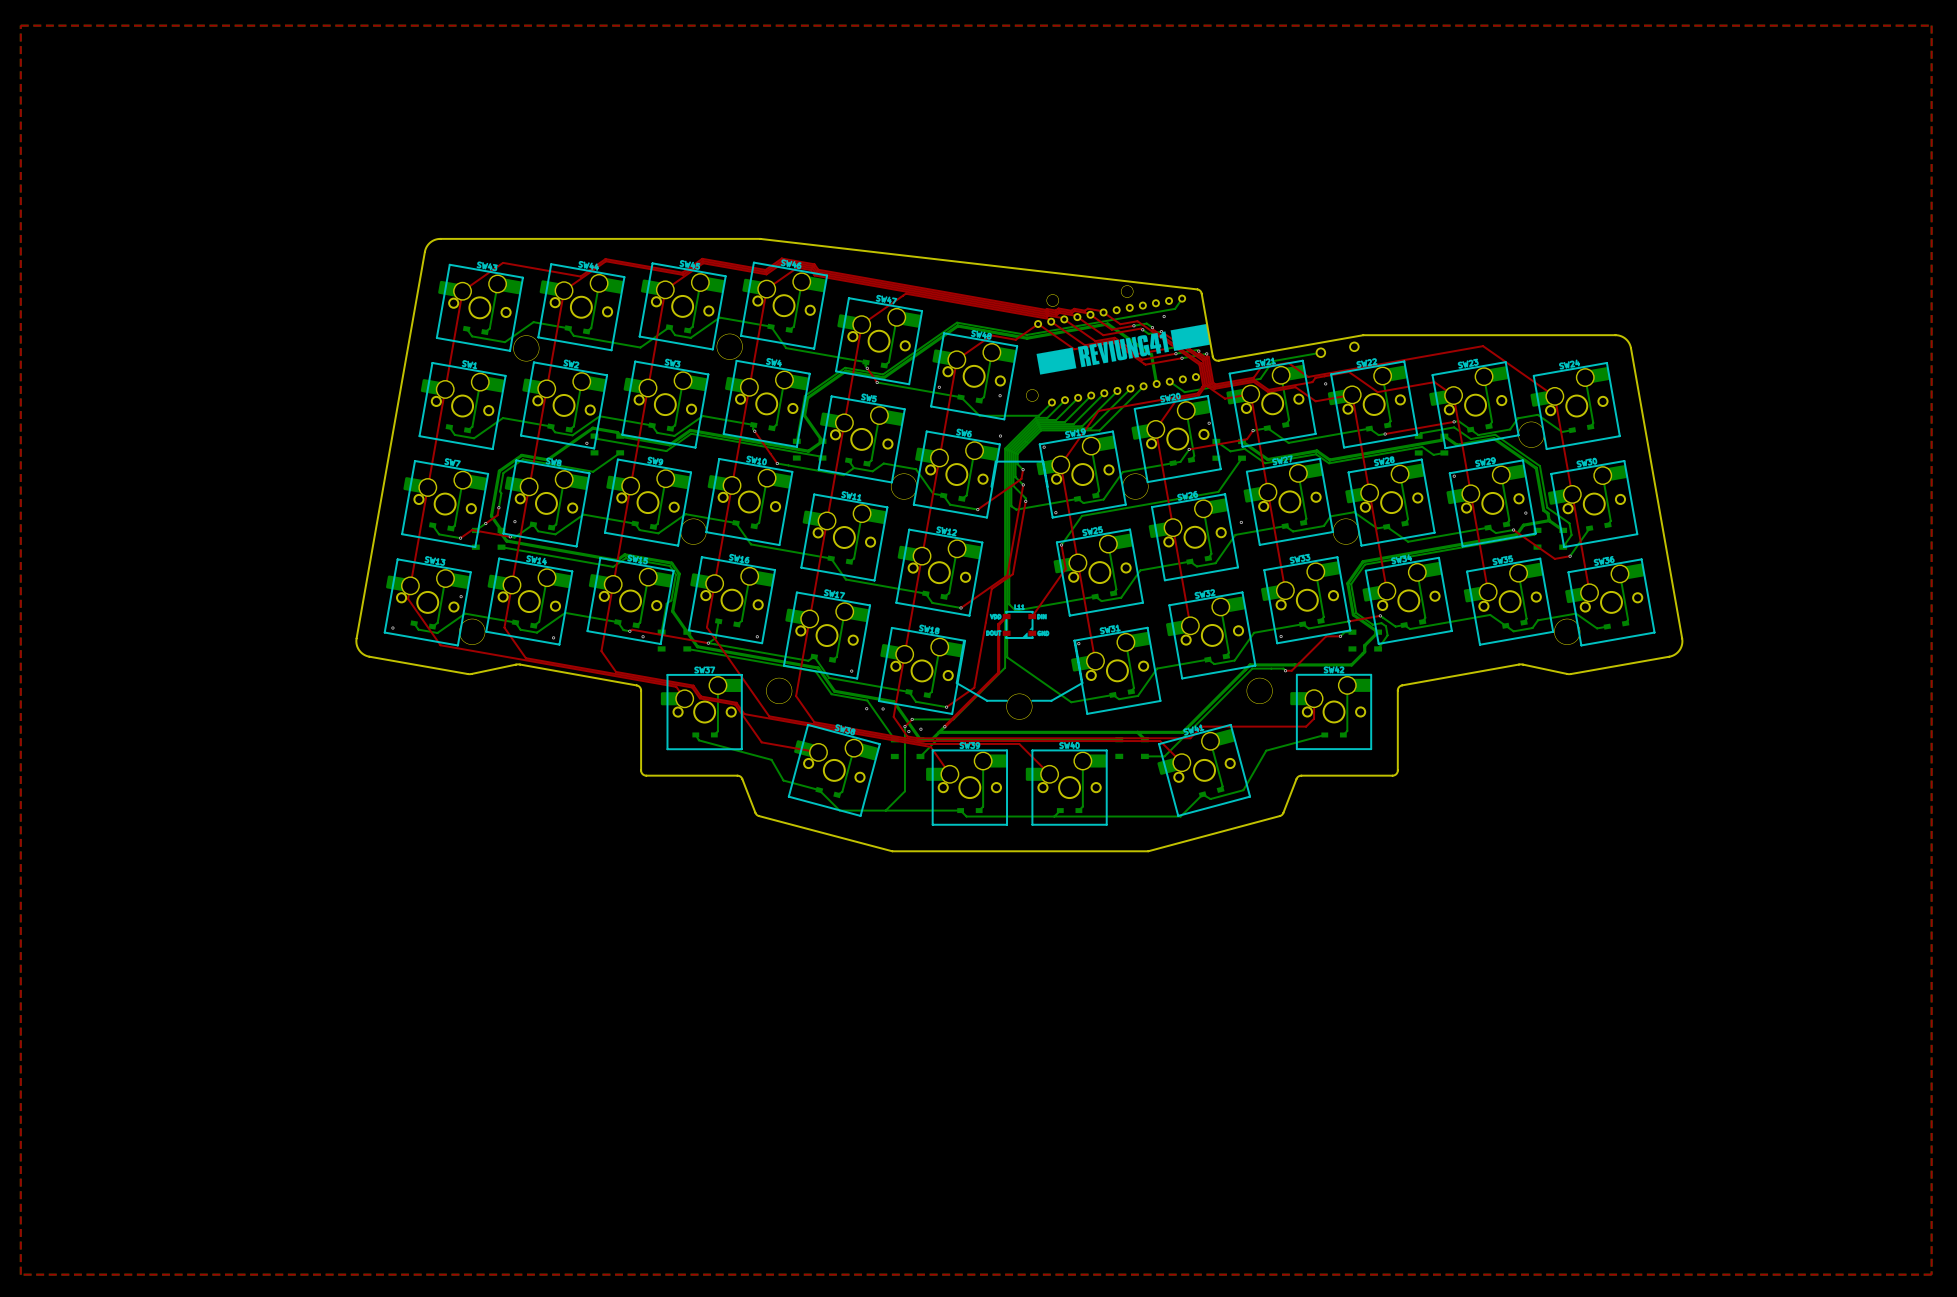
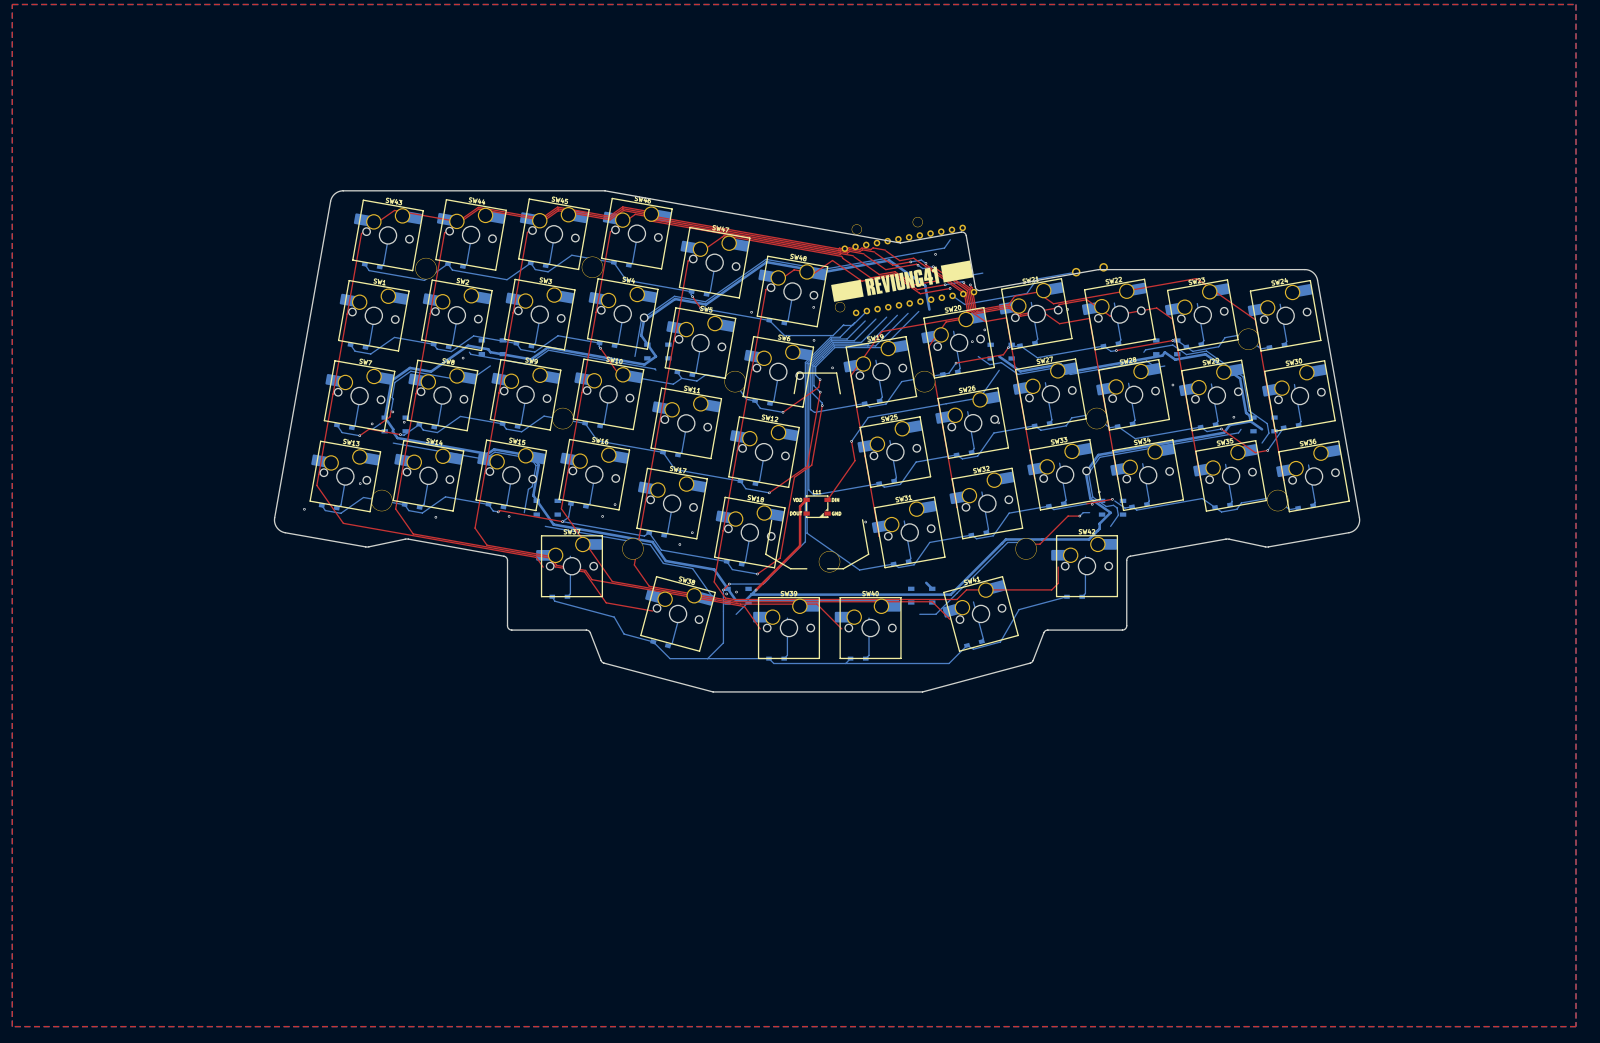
board edge: (440, 238) (760, 238) (1197, 289) (1201, 293) (1212, 356) (1217, 360) (1363, 335) (1620, 336) (1627, 340) (1630, 348) (1682, 638) (1681, 646) (1677, 652) (1671, 656) (1570, 674) (1520, 664) (1401, 685) (1397, 690) (1397, 770) (1395, 774) (1299, 775) (1296, 778) (1280, 815) (1148, 851) (892, 851) (758, 815) (755, 813) (742, 778) (739, 776) (642, 774) (641, 690) (637, 685) (518, 664) (468, 674) (367, 656) (358, 648) (356, 638) (424, 251) (430, 242) (440, 238) -> (343, 190) (334, 193) (330, 201) (274, 517) (276, 526) (283, 532) (366, 546) (407, 539) (504, 556) (507, 560) (508, 628) (587, 630) (603, 663) (713, 691) (922, 691) (1030, 662) (1046, 630) (1124, 629) (1126, 625) (1126, 560) (1129, 556) (1226, 539) (1268, 546) (1350, 532) (1358, 524) (1359, 517) (1317, 280) (1314, 274) (1309, 270) (1098, 269) (978, 290) (975, 287) (966, 235) (962, 232) (900, 242) (604, 190) (343, 190)
bottom track: (801, 281) (793, 326) (789, 329) -> (639, 225) (632, 262) (628, 265)
bottom track: (700, 282) (692, 327) (687, 330) -> (556, 226) (549, 262) (545, 265)
bottom track: (497, 283) (489, 328) (485, 331) -> (390, 227) (383, 264) (379, 267)
bottom track: (599, 283) (591, 328) (586, 331) -> (473, 227) (466, 263) (463, 266)
bottom track: (1182, 298) (1175, 308) (1026, 334) (957, 322) (883, 374) (845, 367) (804, 396) (796, 441) -> (950, 239) (944, 248) (823, 269) (766, 259) (705, 301) (674, 296) (641, 319) (634, 356)
top track: (1102, 311) (1087, 308) (1084, 310) (1074, 308) (1071, 310) (1058, 308) (1055, 310) (1045, 309) (818, 269) (814, 264) (781, 258) (765, 269) (702, 258) (682, 272) (605, 259) (580, 276) (503, 262) (462, 291) (410, 585) -> (885, 250) (873, 247) (870, 249) (838, 248) (652, 216) (649, 211) (622, 206) (609, 216) (557, 207) (541, 218) (478, 207) (457, 221) (394, 210) (361, 233) (318, 474)
top track: (1103, 312) (1120, 324) (1137, 321) (1199, 364) (1203, 385) (1197, 393) (1098, 410) (1060, 464) (1095, 661) -> (886, 251) (899, 260) (913, 258) (964, 293) (967, 310) (962, 317) (881, 331) (850, 375) (879, 536)
top track: (1089, 313) (1074, 311) (1071, 312) (1059, 310) (1056, 312) (1046, 312) (817, 271) (813, 266) (782, 260) (766, 272) (702, 261) (683, 274) (605, 261) (564, 290) (504, 627) (525, 658) (692, 687) (699, 698) (735, 704) (761, 742) (818, 752) -> (874, 251) (862, 249) (860, 251) (839, 250) (651, 217) (648, 213) (623, 208) (609, 218) (557, 208) (541, 220) (478, 209) (444, 233) (395, 508) (413, 533) (549, 557) (555, 566) (584, 571) (606, 602) (652, 611)
top track: (1090, 314) (1111, 329) (1133, 325) -> (875, 252) (892, 265) (910, 261)
top track: (1076, 315) (1059, 312) (1056, 314) (1046, 314) (815, 273) (812, 268) (782, 263) (766, 274) (703, 263) (665, 289) (630, 485) -> (863, 253) (849, 251) (839, 252) (650, 219) (647, 214) (623, 210) (610, 219) (558, 210) (527, 232) (499, 393)
via: (1164, 316) -> none
bottom track: (896, 317) (888, 362) (884, 365) -> (716, 254) (710, 291) (706, 294)
top track: (1077, 317) (1103, 335) (1142, 329) -> (864, 254) (885, 269) (918, 265)
top track: (1063, 318) (814, 275) (810, 270) (797, 267) (766, 289) (732, 485) -> none
top track: (1064, 319) (1095, 341) (1114, 337) (1137, 353) (1166, 348) -> (853, 256) (879, 274) (895, 271) (913, 284) (937, 280)
bottom track: (1133, 325) (1146, 323) (1152, 327) -> (910, 261) (921, 260) (925, 263)
via: (1133, 325) -> none
top track: (1152, 327) (1201, 363) (1205, 386) (1198, 395) (1176, 399) (1155, 429) (1190, 625) -> (925, 263) (965, 292) (969, 311) (963, 318) (946, 322) (928, 346) (956, 507)
via: (1152, 327) -> none
bottom track: (568, 328) (573, 335) (640, 347) (669, 327) (675, 335) (690, 337) (719, 317) (771, 326) (786, 348) (866, 362) (867, 368) -> none
bottom track: (568, 328) (533, 322) (504, 342) (472, 336) (466, 328) -> none
part position: (678, 328) -> (538, 264)
part position: (780, 328) -> (621, 263)
part position: (577, 329) -> (455, 265)
bottom track: (1142, 329) (1148, 333) (1161, 331) -> (918, 265) (922, 268) (933, 266)
via: (1142, 329) -> none
part position: (475, 330) -> (372, 265)
via: none -> (935, 254)
top track: (1161, 331) (1202, 360) (1207, 386) (1224, 398) (1250, 394) (1285, 590) -> (933, 266) (967, 290) (971, 311) (985, 321) (1006, 317) (1034, 478)
via: (1161, 331) -> none
top track: none -> (853, 255) (649, 220) (646, 216) (635, 214) (610, 231) (561, 508) (612, 581) (740, 604) (816, 604) (841, 628)
via: none -> (910, 261)
via: none -> (925, 263)
bottom track: none -> (364, 264) (369, 270) (424, 280) (448, 263) (452, 270) (507, 279) (530, 263) (535, 269) (548, 271) (571, 255) (613, 262) (626, 280) (691, 291) (692, 296)
via: none -> (918, 265)
via: none -> (933, 266)
top track: (1188, 346) (1189, 348) (1204, 359) (1209, 385) (1214, 388) (1253, 381) (1268, 392) (1295, 387) (1315, 401) (1352, 394) (1386, 591) -> (955, 278) (968, 289) (972, 310) (976, 313) (1008, 307) (1020, 316) (1043, 312) (1059, 323) (1089, 318) (1117, 479)
top track: none -> (794, 269) (765, 289) (714, 581) (725, 597) (956, 599) (966, 589) (1051, 589) (1058, 583) (1058, 567)
top track: none -> (794, 269) (814, 273) (832, 260) (861, 281) (894, 275) (920, 293) (950, 288)
drawing position: (1123, 349) -> (902, 281)
bottom track: (1198, 351) (1175, 353) -> (963, 282) (945, 284)
top track: (1198, 351) (1206, 358) (1211, 384) (1215, 386) (1254, 379) (1268, 389) (1312, 382) (1315, 377) (1348, 372) (1377, 392) (1434, 382) (1453, 395) (1488, 592) -> (963, 282) (970, 288) (974, 309) (977, 311) (1009, 306) (1021, 314) (1056, 308) (1059, 304) (1086, 299) (1110, 316) (1156, 308) (1172, 319) (1200, 479)
via: (1198, 351) -> none
bottom track: (991, 352) (984, 397) (979, 400) -> (794, 283) (788, 320) (784, 323)
top track: (1175, 353) (1142, 359) (1114, 340) (1084, 345) (1049, 319) (905, 293) (861, 324) (809, 618) -> (945, 284) (917, 289) (894, 273) (870, 277) (841, 256) (724, 235) (688, 260) (645, 501)
via: (1175, 353) -> none
top track: (1206, 353) (1213, 382) (1215, 384) (1253, 377) (1260, 367) (1288, 362) (1308, 376) (1483, 346) (1554, 396) (1589, 592) -> (970, 284) (977, 309) (1009, 304) (1014, 296) (1037, 292) (1053, 303) (1196, 278) (1255, 319) (1283, 480)
via: (1206, 353) -> none
top track: (1181, 358) (1145, 364) (1113, 342) (1074, 349) (1038, 324) (1015, 339) (991, 335) (956, 359) (893, 716) (907, 736) (917, 738) (1190, 738) (1202, 726) (1306, 726) (1314, 718) (1314, 698) -> none
via: (1181, 358) -> none
part position: (875, 363) -> (699, 293)
via: none -> (963, 282)
top track: (867, 368) (877, 382) -> (692, 296) (700, 308)
via: (867, 368) -> none
via: none -> (945, 284)
via: none -> (970, 284)
via: none -> (950, 288)
bottom track: (1281, 375) (1289, 420) (1285, 424) -> (1031, 302) (1037, 339) (1035, 343)
bottom track: (1382, 376) (1390, 421) (1387, 425) -> (1114, 303) (1120, 340) (1118, 343)
bottom track: (1484, 376) (1492, 422) (1489, 426) -> (1197, 303) (1203, 340) (1201, 344)
bottom track: (1585, 377) (1593, 423) (1590, 426) -> (1280, 304) (1286, 341) (1284, 344)
bottom track: (784, 379) (776, 425) (772, 428) -> (624, 306) (618, 343) (614, 345)
bottom track: (683, 380) (675, 425) (670, 428) -> (541, 306) (535, 343) (531, 346)
bottom track: (581, 381) (573, 426) (569, 429) -> (458, 307) (452, 344) (448, 346)
bottom track: (480, 382) (472, 426) (467, 430) -> (375, 308) (369, 344) (365, 347)
via: none -> (692, 296)
bottom track: (877, 382) (961, 397) (979, 415) (1038, 415) (1052, 402) -> none
via: (877, 382) -> none
via position: (1325, 383) -> (1067, 309)
bottom track: (1156, 384) (1151, 354) (1107, 324) (1027, 338) (957, 325) (883, 377) (845, 371) (807, 397) (804, 415) (822, 441) (808, 451) (690, 430) (669, 444) (620, 436) (617, 432) (592, 428) (547, 459) (521, 455) (499, 471) (491, 516) (506, 541) (616, 560) (624, 554) (671, 563) (679, 573) (672, 611) (697, 646) (818, 668) (834, 691) (893, 701) (920, 739) (931, 739) (939, 732) (1182, 732) (1250, 664) (1351, 664) (1364, 651) (1364, 645) (1378, 632) (1353, 614) (1347, 583) (1363, 561) (1516, 534) (1523, 525) (1549, 520) -> none
bottom track: (1143, 386) (1099, 430) (1041, 430) (1017, 453) (1017, 464) (1023, 469) -> (918, 311) (882, 347) (834, 347) (815, 366) (815, 375) (820, 379)
via position: (939, 387) -> (751, 312)
bottom track: (1130, 388) (1090, 428) (1040, 428) (1015, 453) (1015, 477) (1023, 484) -> (908, 313) (875, 345) (834, 345) (813, 366) (813, 385) (820, 392)
bottom track: (1117, 390) (1082, 426) (1039, 426) (1013, 452) (1013, 486) (1025, 498) (1025, 501) -> (897, 315) (868, 344) (833, 344) (812, 365) (812, 393) (822, 403) (822, 405)
bottom track: (1104, 393) (1073, 424) (1038, 424) (1011, 451) (1011, 506) (1016, 509) (1077, 498) (1083, 503) (1103, 499) (1122, 472) (1180, 461) (1189, 449) -> (886, 317) (861, 342) (832, 342) (810, 364) (810, 409) (814, 412) (864, 403) (869, 406) (886, 404) (901, 381) (948, 373) (956, 363)
bottom track: (1091, 395) (1064, 422) (1037, 422) (1009, 450) (1009, 604) (1015, 610) (1095, 596) (1101, 601) (1121, 597) (1140, 570) (1189, 561) (1196, 566) (1215, 563) (1235, 534) (1285, 526) (1293, 531) (1324, 526) (1330, 516) (1354, 512) (1377, 528) (1386, 526) (1408, 541) (1488, 527) (1495, 533) (1513, 529) -> (875, 319) (854, 340) (832, 340) (808, 363) (808, 489) (813, 495) (879, 483) (884, 487) (900, 484) (916, 462) (956, 454) (962, 458) (977, 456) (993, 433) (1034, 425) (1041, 430) (1066, 425) (1071, 417) (1090, 414) (1109, 427) (1117, 426) (1135, 438) (1200, 427) (1207, 431) (1221, 429)
via: none -> (700, 308)
bottom track: (1078, 397) (1056, 419) (1036, 419) (1007, 449) (1007, 657) (1071, 702) (1112, 694) (1119, 699) (1138, 695) (1157, 668) (1207, 659) (1214, 664) (1234, 660) (1254, 632) (1302, 624) (1308, 628) (1349, 621) -> (865, 320) (847, 338) (831, 338) (807, 363) (807, 533) (859, 570) (893, 564) (898, 567) (914, 564) (929, 542) (971, 535) (976, 538) (993, 535) (1009, 513) (1048, 506) (1053, 509) (1086, 503)
bottom track: none -> (929, 309) (925, 285) (889, 260) (823, 272) (766, 262) (706, 304) (675, 299) (643, 320) (641, 335) (655, 356) (644, 364) (547, 347) (531, 359) (490, 352) (488, 349) (468, 345) (430, 371) (409, 367) (391, 380) (385, 417) (397, 438) (487, 453) (494, 449) (532, 456) (538, 464) (533, 495) (553, 524) (652, 541) (665, 561) (714, 569) (736, 600) (745, 600) (756, 590)
part position: (970, 399) -> (776, 321)
bottom track: (1186, 410) (1194, 455) (1191, 459) -> (953, 331) (960, 368) (957, 371)
bottom track: none -> (854, 322) (840, 337) (830, 337) (805, 362) (805, 541) (763, 584) (729, 584)
bottom track: (879, 415) (871, 460) (867, 463) -> (702, 335) (696, 372) (692, 374)
bottom track: (1454, 421) (1458, 421) (1478, 435) (1510, 429) (1517, 418) (1537, 414) (1562, 431) (1572, 430) -> (1172, 340) (1176, 339) (1192, 351) (1218, 346) (1225, 337) (1241, 334) (1261, 348) (1269, 347)
top track: (1454, 421) (1385, 434) -> (1172, 340) (1116, 350)
via position: (1454, 421) -> (1172, 340)
part position: (762, 426) -> (607, 344)
part position: (1276, 426) -> (1027, 344)
bottom track: (449, 427) (454, 434) (474, 438) (503, 418) (550, 426) (555, 432) (572, 435) (599, 416) (652, 425) (657, 432) (674, 435) (702, 416) (753, 424) (754, 431) -> (350, 344) (355, 351) (370, 354) (394, 337) (433, 344) (437, 349) (451, 351) (473, 335) (516, 343) (520, 349) (534, 352) (558, 335) (599, 343) (600, 348)
part position: (661, 427) -> (524, 344)
part position: (1378, 427) -> (1111, 344)
part position: (458, 428) -> (358, 346)
part position: (560, 428) -> (441, 345)
part position: (1479, 428) -> (1193, 345)
part position: (1581, 428) -> (1277, 346)
bottom track: (1023, 430) (1005, 448) (1005, 667) (953, 719) (912, 719) -> (832, 335) (784, 335) (769, 320) (700, 308)
bottom track: (1253, 430) (1267, 428) (1288, 442) (1369, 428) (1378, 435) (1385, 434) -> (1008, 347) (1020, 345) (1037, 357) (1103, 346) (1111, 351) (1116, 350)
top track: (1253, 430) (1247, 439) (1189, 449) -> (1008, 347) (1003, 354) (956, 363)
via position: (1253, 430) -> (1008, 347)
top track: (754, 431) (777, 463) -> (600, 348) (618, 374)
via: (754, 431) -> none
via position: (1385, 434) -> (1116, 350)
bottom track: (594, 436) (596, 438) (666, 451) (691, 433) (822, 458) -> (469, 352) (470, 354) (528, 364) (548, 350) (655, 370)
bottom track: (1418, 436) (1420, 433) (1454, 427) (1470, 439) (1495, 434) (1539, 466) (1547, 507) (1569, 523) (1571, 535) (1563, 547) -> (1143, 352) (1145, 349) (1172, 345) (1186, 354) (1206, 351) (1243, 376) (1249, 410) (1267, 423) (1268, 433) (1262, 443)
via: none -> (972, 341)
bottom track: (1216, 441) (1230, 451) (1244, 448) (1265, 463) (1316, 454) (1329, 463) (1422, 446) (1433, 454) (1444, 452) -> (978, 356) (989, 364) (1001, 362) (1018, 374) (1059, 367) (1070, 374) (1146, 361) (1156, 367) (1164, 366)
bottom track: (1242, 441) (1267, 459) (1316, 450) (1329, 460) (1441, 440) (1444, 436) (1457, 445) (1494, 438) (1536, 468) (1543, 510) (1547, 513) (1549, 520) -> (999, 356) (1020, 371) (1060, 364) (1071, 371) (1162, 355) (1164, 352) (1175, 359) (1205, 354) (1240, 378) (1246, 413) (1249, 415) (1250, 421)
via position: (586, 443) -> (463, 358)
via: none -> (600, 348)
bottom track: (1091, 446) (1099, 490) (1095, 495) -> (875, 360) (882, 397) (879, 400)
via: (1044, 447) -> none
via: (1189, 449) -> none
bottom track: (974, 450) (966, 495) (961, 498) -> (780, 364) (773, 400) (770, 403)
bottom track: (620, 452) (593, 471) (522, 459) (503, 473) (498, 507) -> (490, 365) (468, 381) (410, 371) (394, 382) (391, 410)
bottom track: (1242, 458) (1218, 491) (1081, 515) (1061, 545) -> (999, 370) (979, 397) (868, 417) (851, 441)
bottom track: (848, 460) (853, 468) -> (677, 372) (681, 378)
part position: (1182, 461) -> (950, 373)
part position: (857, 462) -> (684, 373)
bottom track: (777, 463) (843, 475) (853, 468) -> (618, 374) (673, 384) (681, 378)
via: (777, 463) -> none
via: none -> (956, 363)
bottom track: (853, 468) (872, 471) (883, 463) (915, 469) (933, 493) (943, 495) (950, 504) (977, 509) -> (681, 378) (696, 381) (706, 374) (732, 379) (746, 399) (755, 400) (760, 408) (783, 412)
top track: (1023, 469) (1021, 479) (977, 509) -> (820, 379) (818, 387) (783, 412)
bottom track: (1298, 473) (1306, 518) (1303, 522) -> (1045, 382) (1051, 419) (1049, 423)
bottom track: (1400, 474) (1408, 519) (1405, 523) -> (1128, 383) (1135, 420) (1132, 423)
bottom track: (1501, 474) (1509, 520) (1506, 524) -> (1211, 383) (1217, 421) (1215, 424)
bottom track: (1602, 475) (1610, 521) (1607, 525) -> (1294, 384) (1301, 421) (1298, 425)
via position: (1454, 476) -> (1172, 385)
bottom track: (665, 478) (657, 523) (653, 526) -> (527, 387) (521, 424) (517, 426)
bottom track: (767, 478) (759, 522) (754, 526) -> (610, 386) (604, 423) (600, 426)
bottom track: (564, 479) (556, 524) (551, 527) -> (444, 387) (438, 424) (434, 427)
bottom track: (462, 480) (454, 525) (450, 528) -> (361, 388) (355, 425) (351, 427)
via: none -> (820, 379)
top track: (1023, 484) (1007, 575) (961, 607) -> (820, 392) (807, 466) (769, 492)
via: (1023, 484) -> none
top track: (732, 485) (714, 583) -> none
top track: (630, 486) (601, 651) (616, 671) (693, 685) (701, 696) (736, 702) (744, 714) (930, 746) (949, 774) -> (498, 393) (475, 528) (487, 545) (550, 556) (556, 565) (585, 570) (592, 579) (744, 606) (760, 628)
line: (991, 486) (995, 461) (1043, 461) (1047, 486) -> (794, 393) (797, 373) (836, 373) (840, 393)
part position: (952, 497) -> (762, 402)
part position: (1086, 497) -> (872, 402)
via: none -> (820, 392)
top track: (1025, 501) (1012, 574) (991, 589) (974, 687) (946, 707) -> (822, 405) (811, 465) (794, 477) (780, 558) (757, 574)
via: (1025, 501) -> none
top track: (498, 507) (497, 515) (485, 523) -> (391, 410) (390, 416) (380, 423)
via: (498, 507) -> none
bottom track: (1203, 508) (1211, 553) (1208, 558) -> (967, 411) (974, 448) (971, 452)
via: (977, 509) -> none
via: (1055, 512) -> none
bottom track: (862, 513) (854, 558) (849, 561) -> (688, 415) (681, 452) (678, 455)
via: (1525, 513) -> none
via: none -> (822, 405)
bottom track: (1549, 520) (1563, 530) -> (1250, 421) (1262, 429)
via: (514, 521) -> none
via position: (1241, 522) -> (998, 422)
bottom track: (485, 523) (475, 530) -> (380, 423) (372, 429)
via: none -> (783, 412)
part position: (745, 524) -> (592, 424)
part position: (1294, 524) -> (1042, 424)
bottom track: (432, 525) (439, 534) (460, 538) -> (336, 425) (342, 432) (359, 435)
part position: (644, 525) -> (510, 425)
part position: (1395, 525) -> (1125, 425)
part position: (441, 526) -> (344, 426)
part position: (542, 526) -> (426, 425)
part position: (1497, 526) -> (1208, 425)
part position: (1598, 526) -> (1291, 426)
bottom track: (1589, 528) (1570, 556) -> (1283, 427) (1267, 450)
top track: (1513, 529) (1554, 558) (1570, 556) -> (1221, 429) (1255, 452) (1267, 450)
bottom track: (1537, 530) (1534, 534) (1364, 564) (1351, 584) (1356, 613) (1372, 624) (1381, 623) (1385, 626) (1387, 635) (1378, 648) -> (1241, 429) (1238, 432) (1099, 457) (1088, 473) (1092, 497) (1106, 506) (1113, 505) (1117, 507) (1118, 515) (1110, 526)
bottom track: none -> (1250, 421) (1229, 425) (1224, 432) (1098, 454) (1085, 472) (1090, 498) (1110, 512) (1099, 523) (1099, 528) (1088, 539) (1005, 539) (950, 594) (751, 594)
via: none -> (404, 422)
bottom track: (510, 536) (514, 537) (533, 524) (538, 531) (555, 534) (583, 514) (635, 523) (639, 530) (658, 533) (685, 514) (736, 523) (750, 544) (831, 558) (845, 579) (925, 593) (932, 602) (961, 607) -> (400, 434) (404, 435) (419, 424) (423, 430) (437, 432) (460, 416) (502, 423) (506, 429) (521, 431) (544, 416) (585, 423) (597, 440) (663, 452) (675, 469) (740, 481) (745, 488) (769, 492)
top track: (510, 536) (472, 530) (460, 538) -> (400, 434) (369, 429) (359, 435)
via: (510, 536) -> none
bottom track: (1108, 544) (1116, 589) (1113, 593) -> (889, 440) (896, 477) (894, 480)
via: none -> (1221, 429)
top track: (1061, 545) (1065, 568) (1032, 616) -> (851, 441) (854, 460) (827, 499)
via position: (1061, 545) -> (851, 441)
bottom track: (501, 547) (612, 567) (625, 558) (669, 565) (675, 574) (671, 600) (666, 603) (661, 632) -> (393, 443) (484, 459) (494, 452) (531, 458) (536, 465) (532, 486) (528, 489) (524, 512)
bottom track: (957, 548) (949, 593) (944, 596) -> (766, 444) (759, 480) (755, 483)
via: none -> (400, 434)
via: none -> (359, 435)
via position: (1570, 556) -> (1267, 450)
part position: (840, 560) -> (670, 453)
part position: (1199, 560) -> (964, 453)
bottom track: (1315, 571) (1323, 617) (1320, 621) -> (1059, 463) (1066, 500) (1063, 503)
bottom track: (1417, 572) (1425, 617) (1422, 621) -> (1142, 463) (1149, 500) (1147, 504)
bottom track: (1518, 573) (1526, 618) (1524, 622) -> (1225, 464) (1232, 501) (1230, 504)
bottom track: (1619, 573) (1628, 619) (1625, 623) -> (1308, 464) (1315, 502) (1313, 505)
bottom track: (749, 576) (741, 621) (736, 624) -> (596, 466) (589, 503) (585, 506)
bottom track: (547, 577) (539, 621) (533, 625) -> (430, 468) (424, 504) (419, 507)
bottom track: (648, 577) (640, 622) (636, 625) -> (513, 467) (506, 504) (503, 507)
bottom track: (445, 578) (437, 623) (432, 626) -> (347, 468) (340, 505) (336, 508)
top track: (714, 583) (706, 627) (769, 716) (925, 743) (1019, 743) (1049, 774) -> none
top track: (410, 585) (408, 598) (440, 645) (676, 686) (684, 698) -> (318, 474) (316, 485) (343, 523) (536, 557) (543, 567)
part position: (934, 595) -> (747, 482)
part position: (1104, 595) -> (886, 482)
via position: (461, 596) -> (360, 483)
bottom track: (1220, 606) (1228, 652) (1226, 656) -> (981, 492) (988, 529) (986, 532)
via position: (961, 607) -> (769, 492)
bottom track: (844, 611) (836, 656) (832, 659) -> (674, 495) (667, 532) (664, 535)
bottom track: (1380, 615) (1395, 626) (1404, 625) (1410, 629) (1490, 614) (1513, 631) (1532, 628) (1537, 620) (1575, 613) (1597, 628) (1607, 626) -> none
top track: (1380, 615) (1349, 621) -> (1112, 499) (1086, 503)
via position: (1380, 615) -> (1112, 499)
top track: (1006, 616) (998, 624) (998, 672) (944, 726) -> (806, 499) (800, 506) (800, 545) (756, 590)
top track: (809, 618) (796, 696) (814, 722) (921, 741) (1160, 741) (1181, 762) -> (645, 501) (634, 565) (649, 586) (736, 601) (932, 601) (949, 619)
bottom track: (718, 621) (715, 638) (708, 643) -> (571, 503) (568, 517) (562, 521)
part position: (727, 622) -> (578, 505)
part position: (1311, 622) -> (1056, 504)
bottom track: (414, 623) (418, 629) (437, 632) (465, 613) (515, 622) (520, 629) (537, 632) (565, 612) (617, 622) (623, 630) (629, 631) -> (321, 505) (325, 510) (340, 513) (363, 497) (404, 504) (408, 510) (422, 513) (445, 496) (488, 504) (493, 510) (498, 511)
part position: (627, 623) -> (496, 505)
part position: (1413, 623) -> (1139, 505)
part position: (524, 624) -> (412, 506)
part position: (1019, 624) -> (817, 506)
part position: (1514, 624) -> (1222, 506)
part position: (423, 625) -> (329, 506)
part position: (1616, 625) -> (1305, 506)
via position: (392, 628) -> (304, 509)
top track: (629, 631) (632, 629) (708, 643) -> (498, 511) (500, 510) (562, 521)
via: (629, 631) -> none
bottom track: (1352, 632) (1344, 632) (1340, 636) -> (1089, 512) (1083, 512) (1079, 516)
bottom track: none -> (1114, 500) (1124, 508) (1132, 506) (1136, 510) (1202, 498) (1221, 511) (1236, 509) (1241, 502) (1272, 497) (1289, 509) (1298, 508)
via: (643, 636) -> none
via: (1281, 636) -> none
top track: (1340, 636) (1326, 636) (1291, 670) (1285, 670) -> (1079, 516) (1068, 516) (1039, 544) (1034, 544)
via position: (553, 637) -> (435, 517)
line: (1075, 640) (1082, 683) (1051, 700) (1032, 700) -> (862, 519) (868, 554) (843, 568) (827, 568)
line: (963, 641) (956, 683) (987, 700) (1006, 700) -> (771, 520) (765, 554) (790, 568) (806, 568)
bottom track: (1125, 642) (1133, 687) (1131, 691) -> (904, 520) (910, 558) (908, 561)
bottom track: (708, 643) (808, 660) (814, 656) (829, 677) (909, 691) (915, 701) (946, 707) -> (562, 521) (644, 536) (649, 532) (661, 550) (726, 561) (732, 569) (757, 574)
via: (708, 643) -> none
via position: (1078, 643) -> (865, 522)
via: none -> (498, 511)
bottom track: (939, 647) (931, 692) (927, 695) -> (751, 524) (745, 561) (741, 564)
bottom track: (687, 648) (815, 671) (831, 694) (867, 700) (894, 739) -> (545, 526) (650, 544) (663, 563) (692, 568) (715, 600)
via: none -> (1079, 516)
via: none -> (509, 516)
via: none -> (602, 516)
via: none -> (562, 521)
part position: (1217, 657) -> (978, 533)
part position: (823, 658) -> (656, 534)
bottom track: (1285, 670) (1283, 668) (1252, 668) (1164, 756) (1144, 756) -> (1034, 544) (1033, 542) (1007, 542) (935, 614) (919, 614)
via: (1285, 670) -> none
bottom track: (717, 685) (717, 731) (714, 734) -> (570, 556) (570, 593) (567, 596)
via: none -> (679, 544)
bottom track: (1347, 685) (1347, 731) (1343, 734) -> (1085, 556) (1085, 593) (1082, 596)
part position: (918, 693) -> (734, 562)
part position: (1122, 693) -> (901, 562)
via: (946, 707) -> none
via: (866, 708) -> none
via: (883, 708) -> none
top track: (912, 719) (904, 726) -> (729, 584) (723, 589)
via: (912, 719) -> none
via: none -> (757, 574)
via: (904, 726) -> none
via: (944, 726) -> none
bottom track: (904, 727) (904, 791) (885, 810) -> (723, 590) (723, 642) (707, 658)
via: (920, 729) -> none
via: (908, 731) -> none
via: none -> (729, 584)
bottom track: (695, 734) (698, 740) (771, 759) (783, 780) (819, 790) (839, 810) (960, 810) (966, 816) (1180, 816) (1202, 794) (1210, 799) (1243, 790) (1266, 750) (1324, 734) -> (552, 596) (554, 601) (614, 617) (624, 634) (653, 641) (670, 658) (768, 658) (773, 663) (949, 663) (967, 645) (973, 649) (1000, 641) (1019, 609) (1066, 596)
part position: (705, 734) -> (559, 596)
part position: (1334, 734) -> (1074, 596)
bottom track: (1119, 739) (937, 739) (920, 756) -> (898, 600) (749, 600) (736, 614)
via: none -> (723, 589)
via: none -> (756, 590)
bottom track: (1210, 741) (1222, 786) (1220, 789) -> (973, 601) (983, 638) (981, 641)
via: none -> (736, 592)
via: none -> (726, 593)
bottom track: (854, 748) (842, 791) (837, 794) -> (681, 607) (672, 643) (667, 645)
bottom track: (983, 761) (983, 806) (979, 810) -> (787, 618) (787, 655) (784, 658)
bottom track: (1082, 761) (1082, 806) (1078, 810) -> (869, 618) (869, 655) (865, 658)
part position: (828, 792) -> (660, 643)
part position: (1211, 792) -> (974, 643)
part position: (969, 810) -> (776, 658)
bottom track: (1060, 810) (1054, 816) -> (850, 658) (845, 663)
part position: (1069, 810) -> (858, 658)

